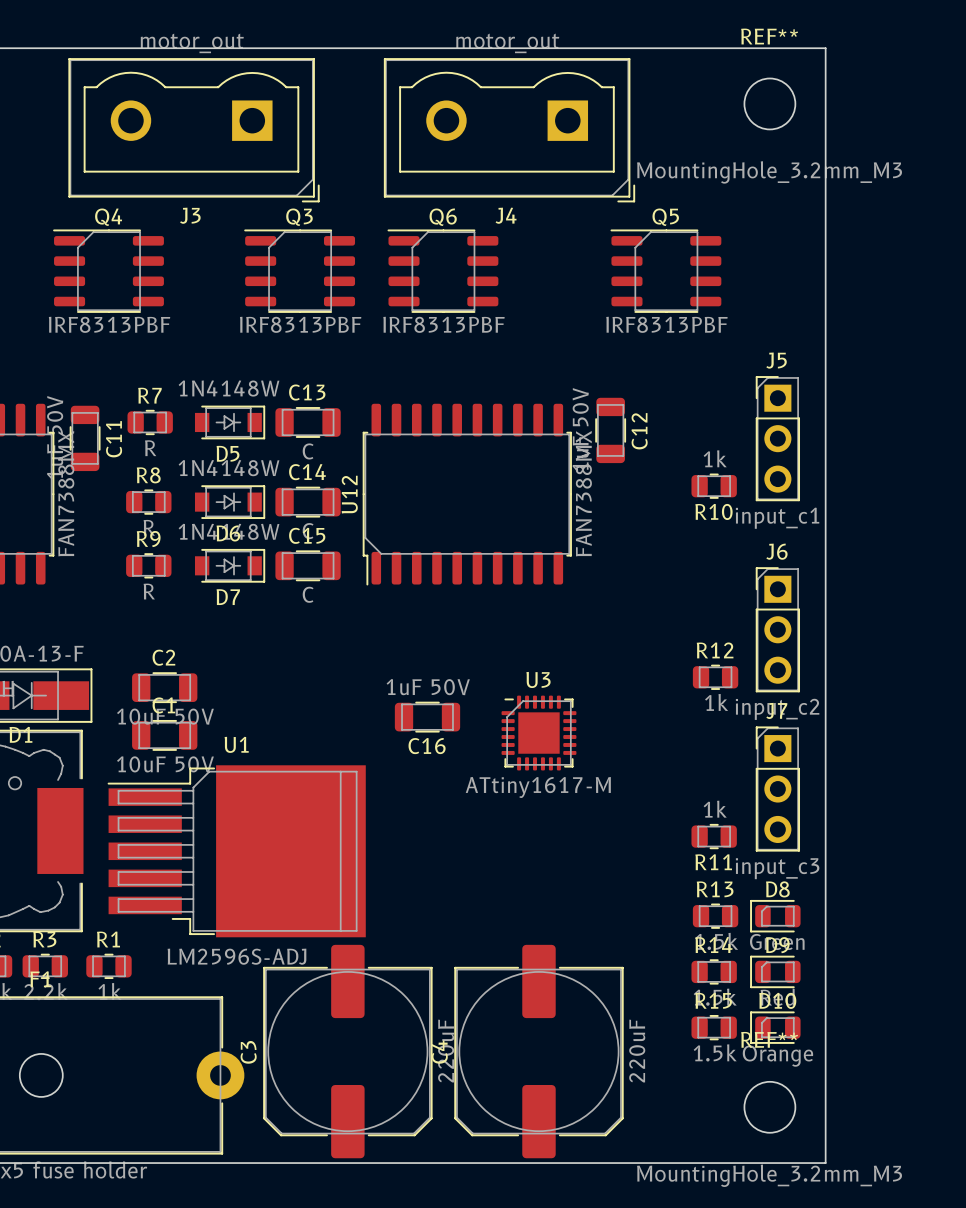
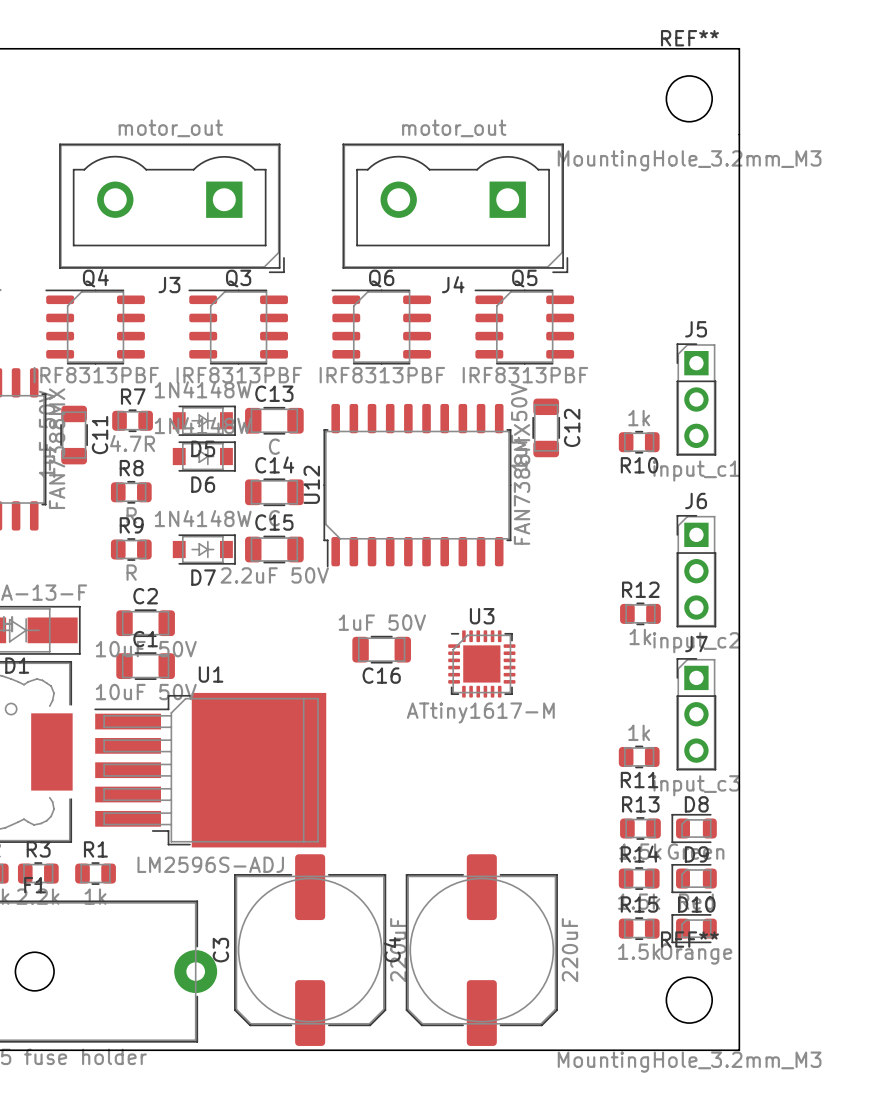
J3 position: (194, 130) -> (171, 208)
J4 position: (509, 130) -> (455, 208)
Q4 position: (108, 271) -> (95, 327)
Q3 position: (299, 271) -> (238, 327)
Q6 position: (442, 271) -> (381, 327)
Q5 position: (665, 271) -> (524, 327)
R7 position: (150, 422) -> (132, 420)
D5 position: (230, 422) -> (204, 420)
C13 position: (308, 422) -> (274, 420)
C12 position: (610, 430) -> (546, 427)
C11 position: (85, 438) -> (74, 435)
R7 value: R (150, 448) -> 4.7R (132, 443)
U12 position: (467, 494) -> (417, 485)
R8 position: (148, 502) -> (131, 492)
C14 position: (308, 502) -> (274, 492)
R9 position: (148, 565) -> (131, 549)
D7 position: (230, 565) -> (204, 549)
C15 position: (308, 565) -> (274, 549)
C15 value: C (308, 594) -> 2.2uF 50V (274, 575)

